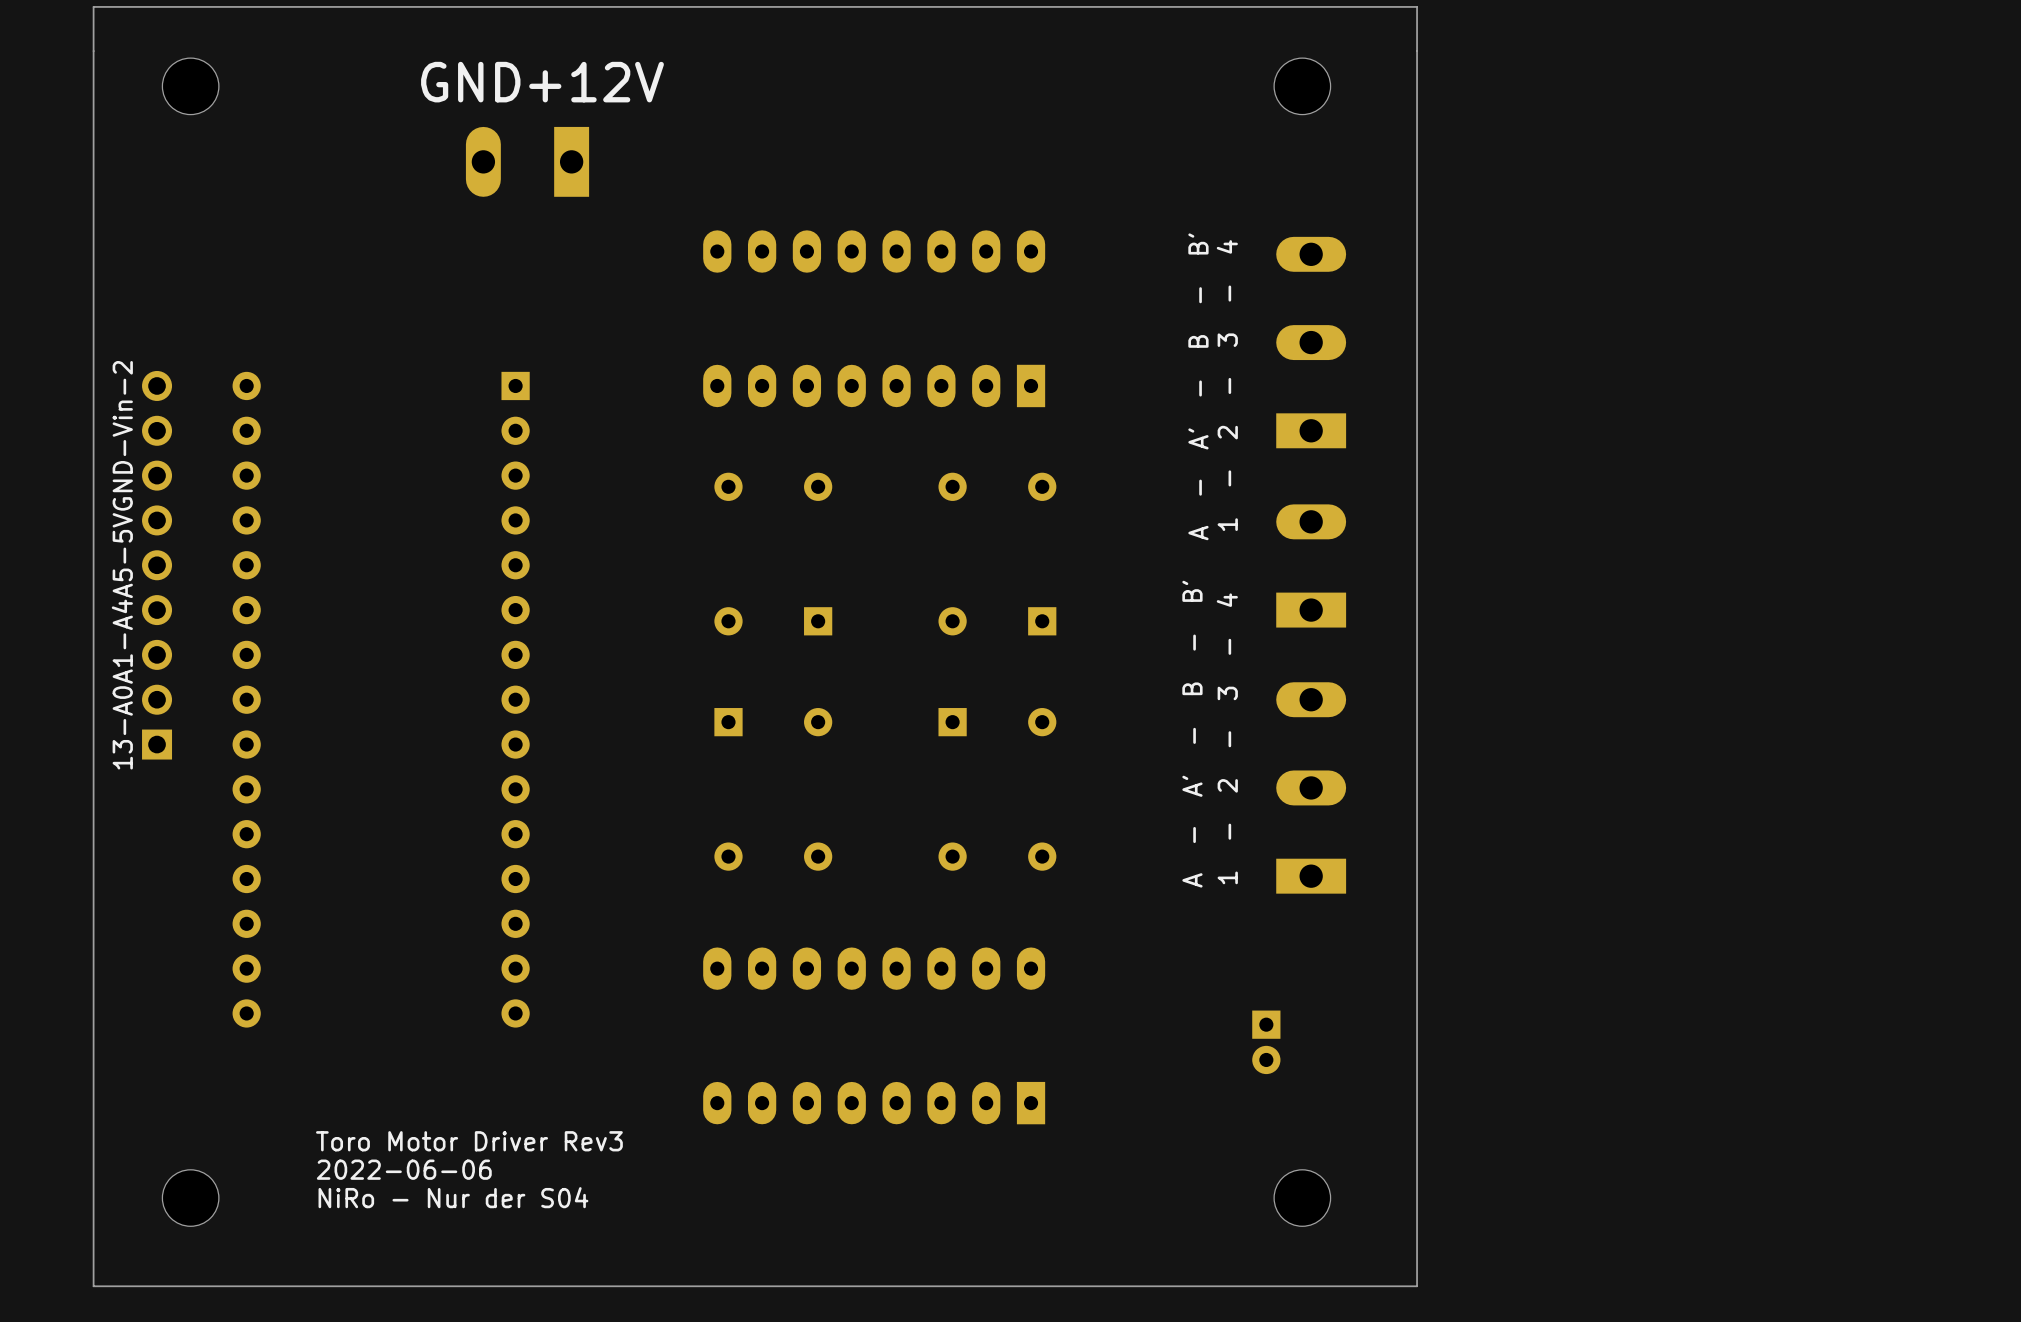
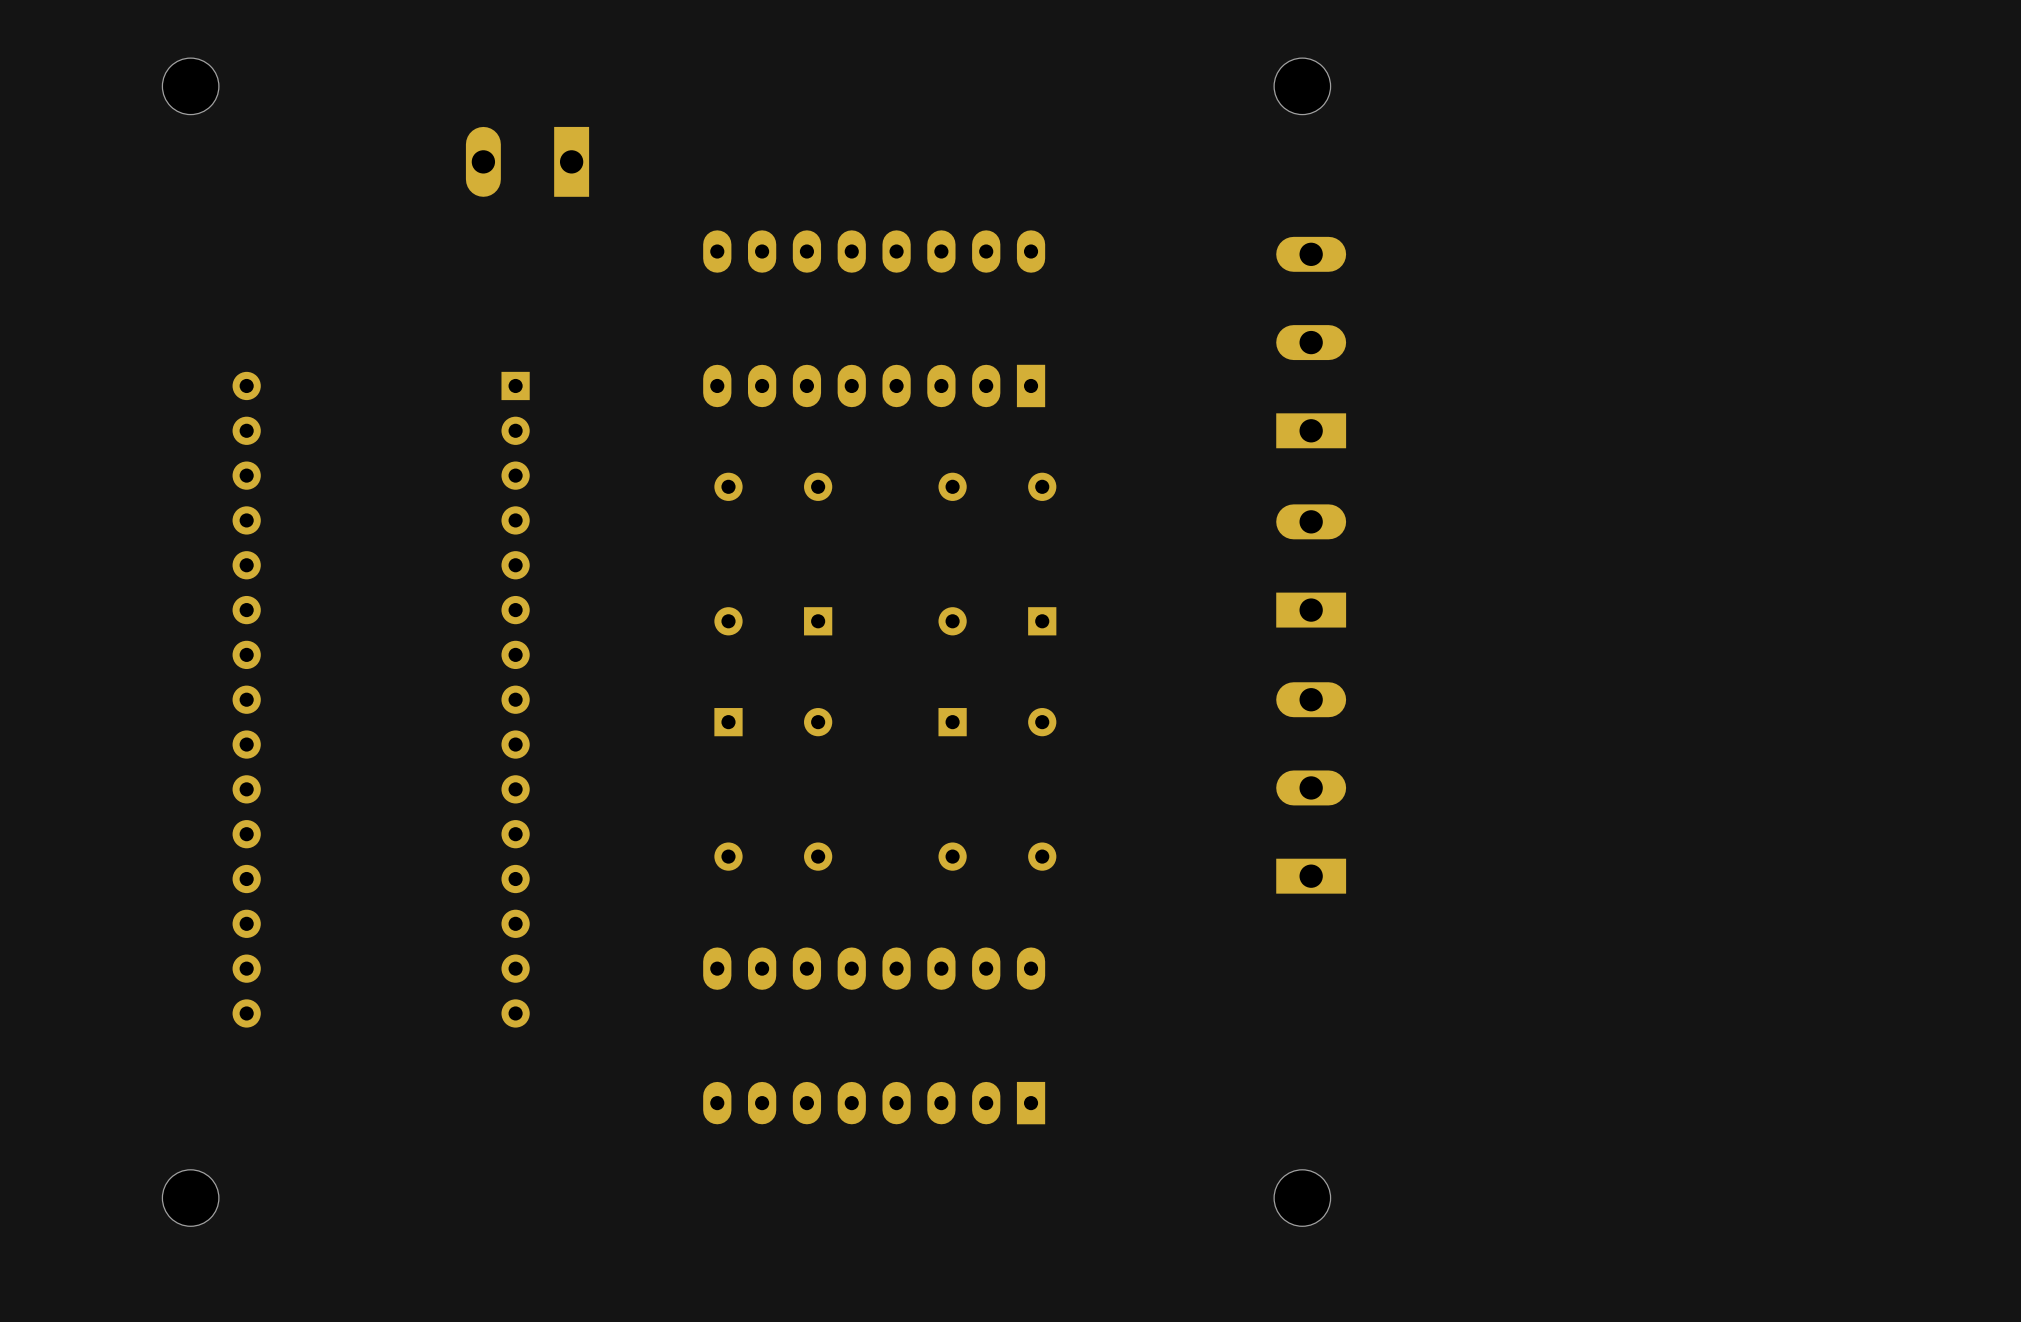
board edge: (1417, 6) (93, 6) (93, 1286) (1417, 1286) (1417, 6) -> none
text: GND (470, 82) -> none
text: +12V (596, 82) -> none
text: 1 - 2 - 3 - 4 (1227, 385) -> none
text: A - A' - B - B' (1198, 386) -> none
text: 13-A0A1-A4A5-5VGND-Vin-2 (122, 565) -> none
part: (157, 565) -> none
text: A - A' - B - B' (1192, 734) -> none
text: 1 - 2 - 3 - 4 (1227, 738) -> none
part: (1266, 1042) -> none
text: Toro Motor Driver Rev3 (469, 1141) -> none
text: 2022-06-06 (404, 1169) -> none
text: NiRo - Nur der S04 (453, 1197) -> none

